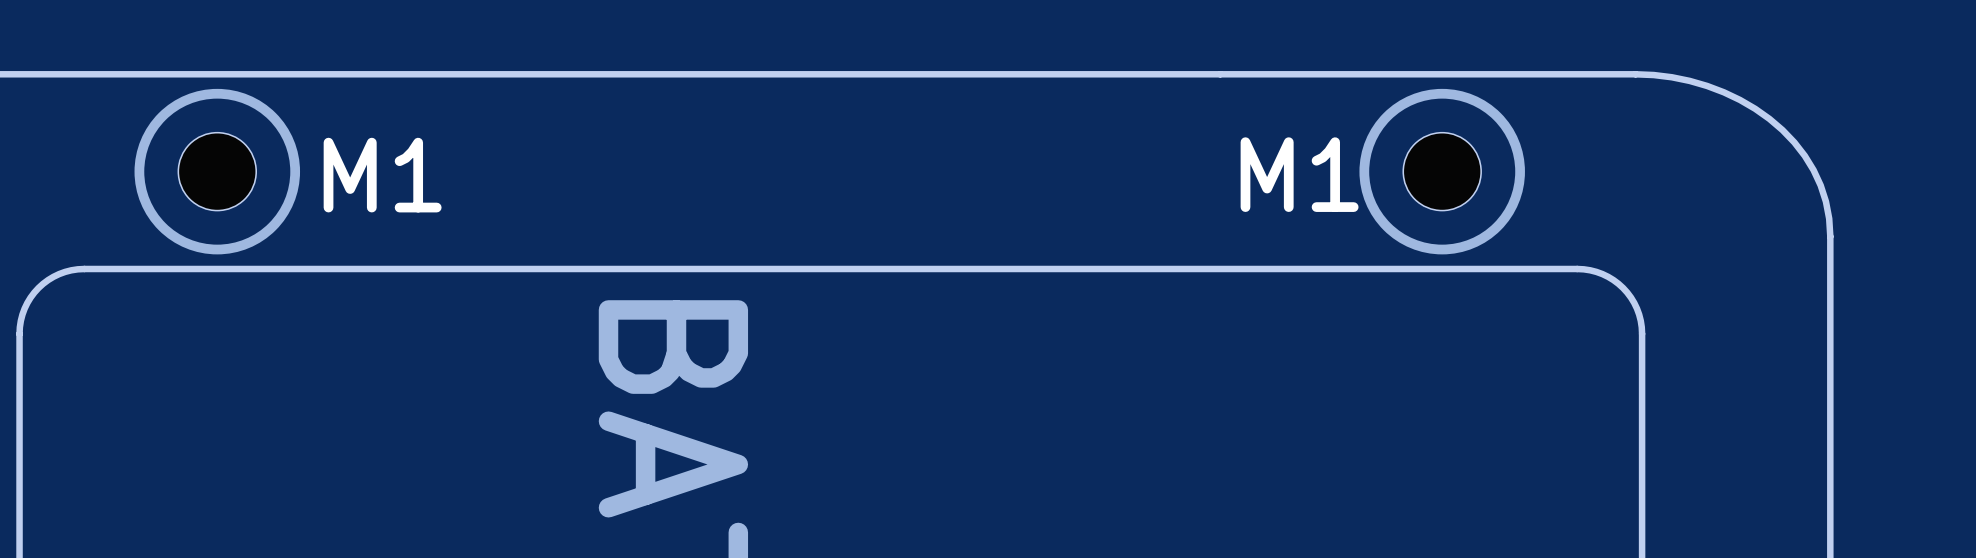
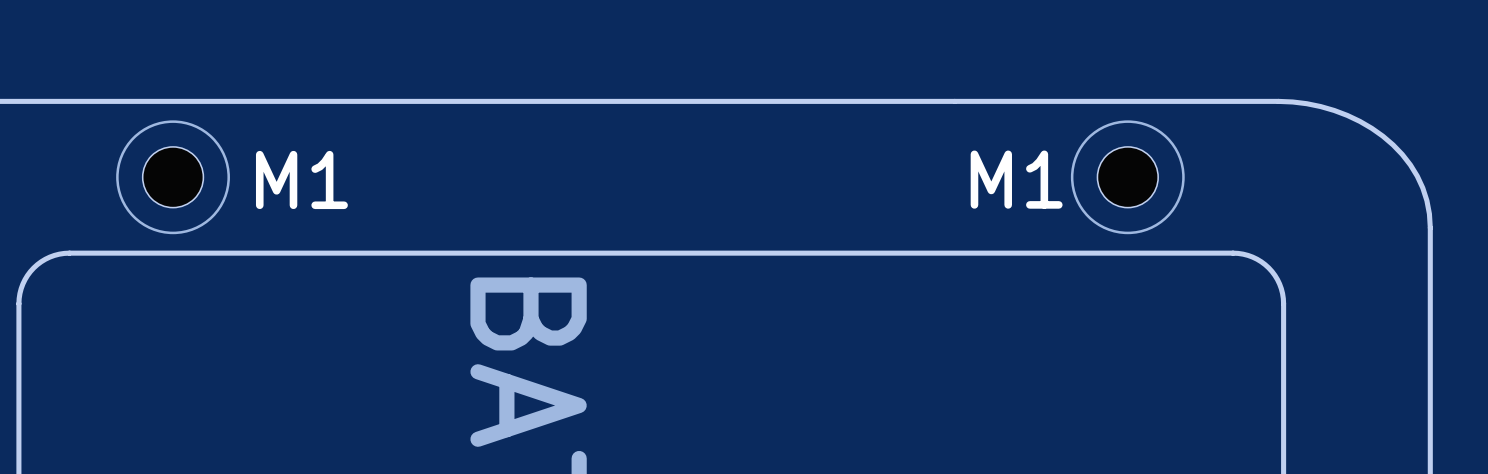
M1 footprint: [134, 88, 301, 255] -> [116, 120, 230, 235]
M1 footprint: [1359, 88, 1525, 255] -> [1070, 120, 1185, 235]

